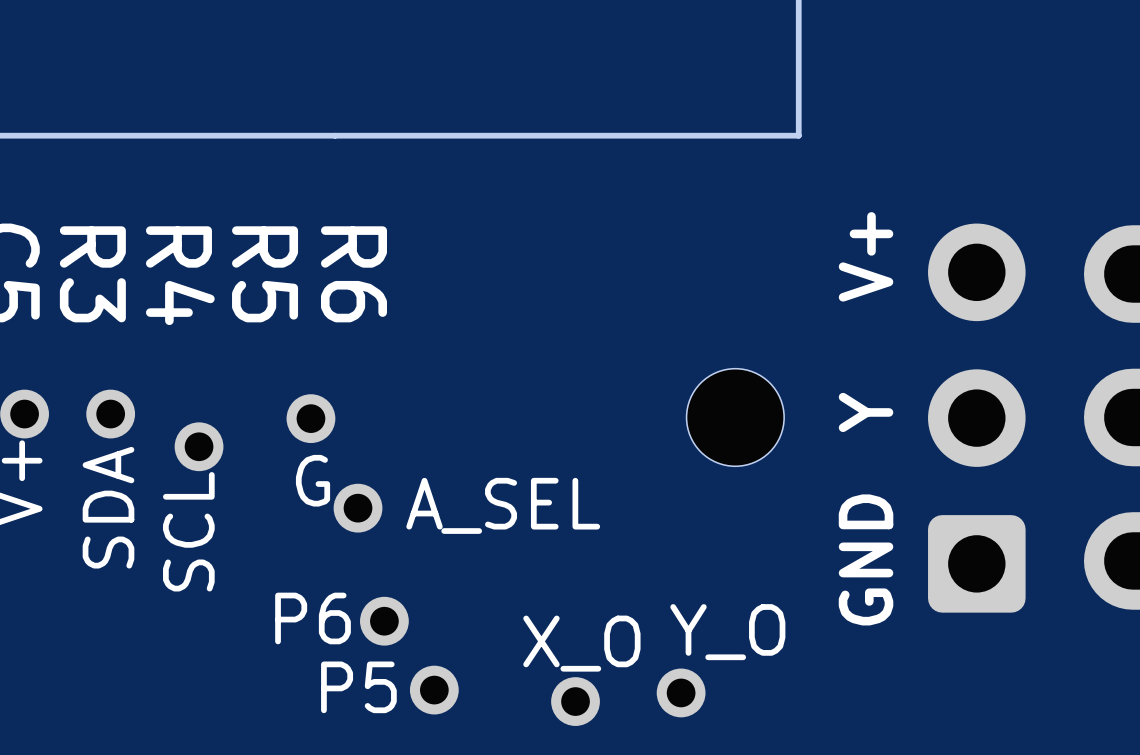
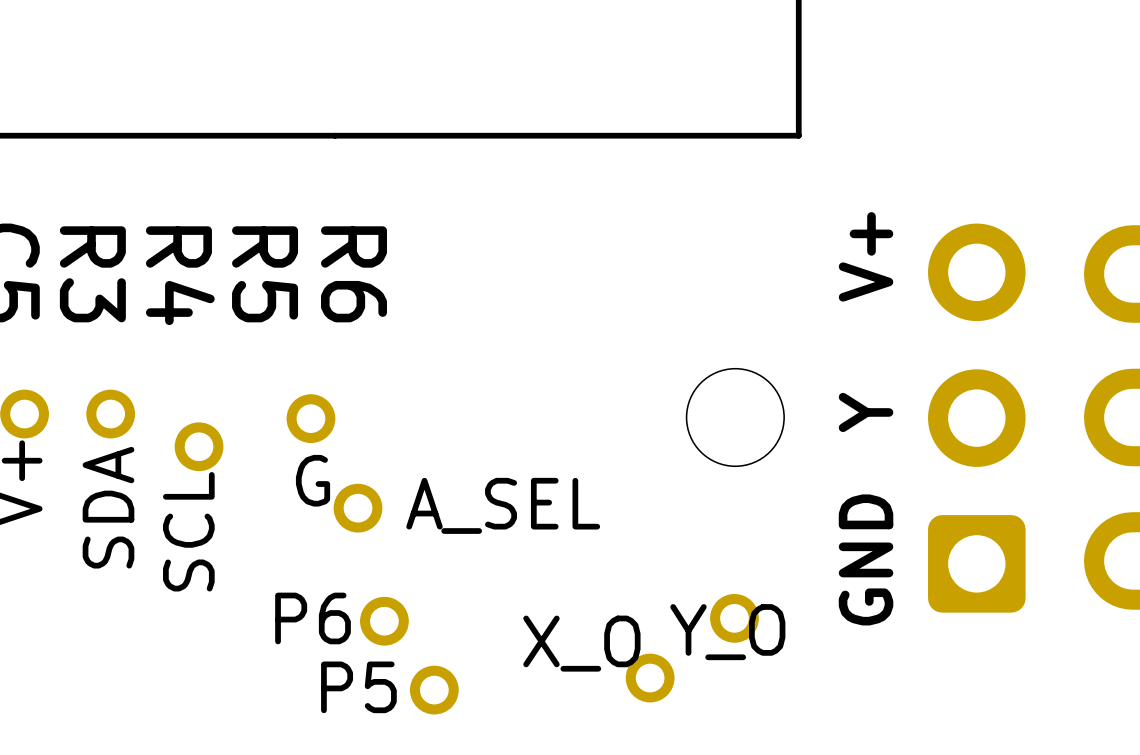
part: none -> (734, 618)
part position: (681, 692) -> (650, 678)
part: (575, 701) -> none

